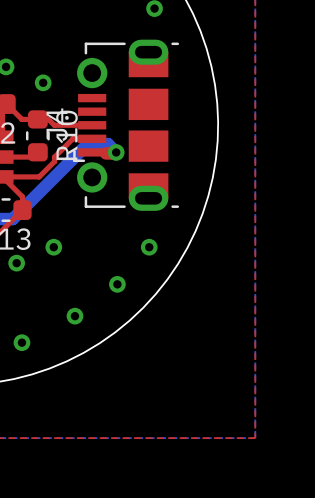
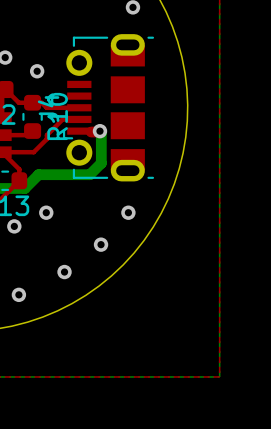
bottom track: (116, 152) (107, 144) (87, 144) (12, 219) -> (99, 131) (101, 163) (89, 174) (38, 174) (24, 188) (10, 188)

